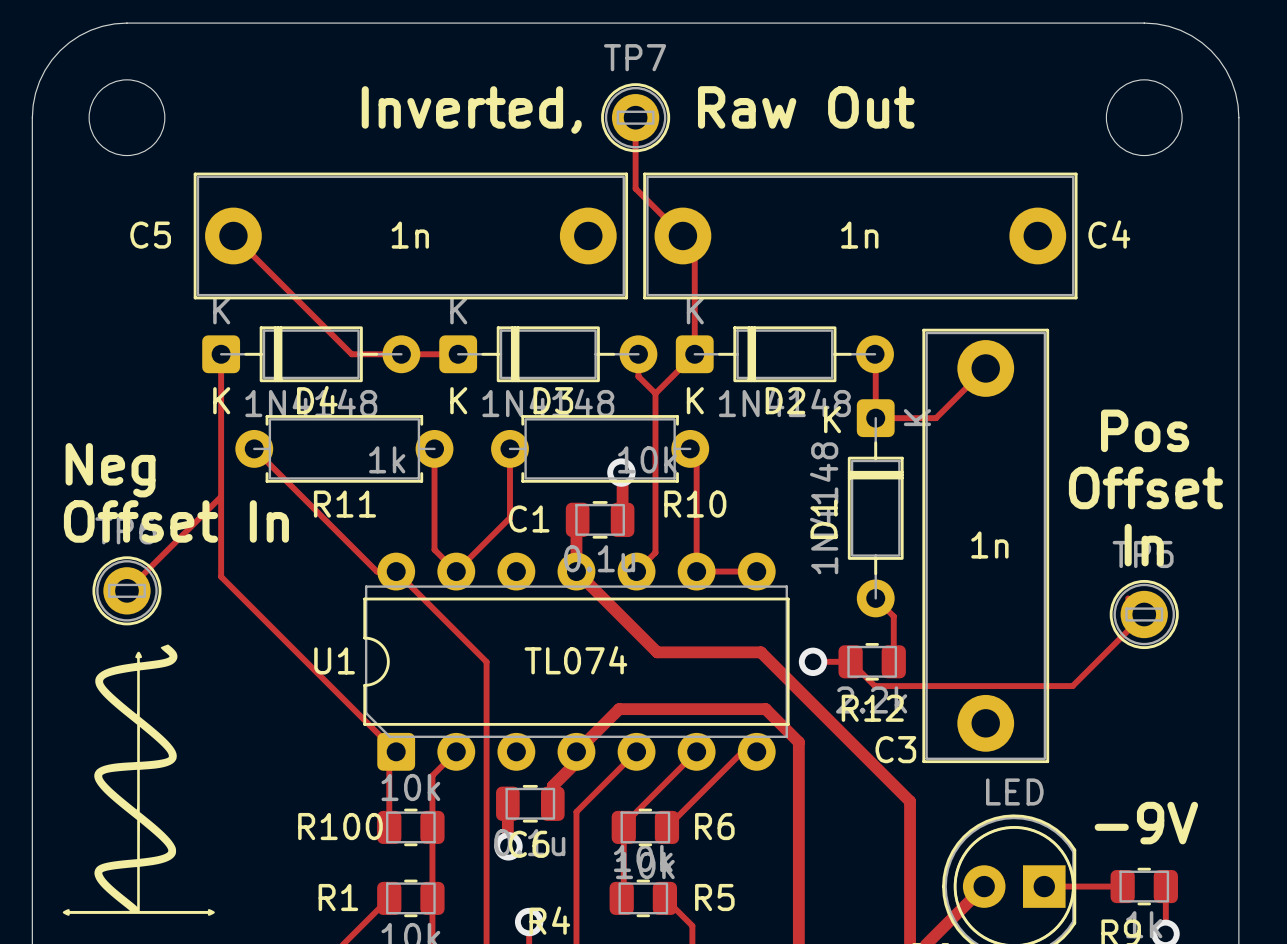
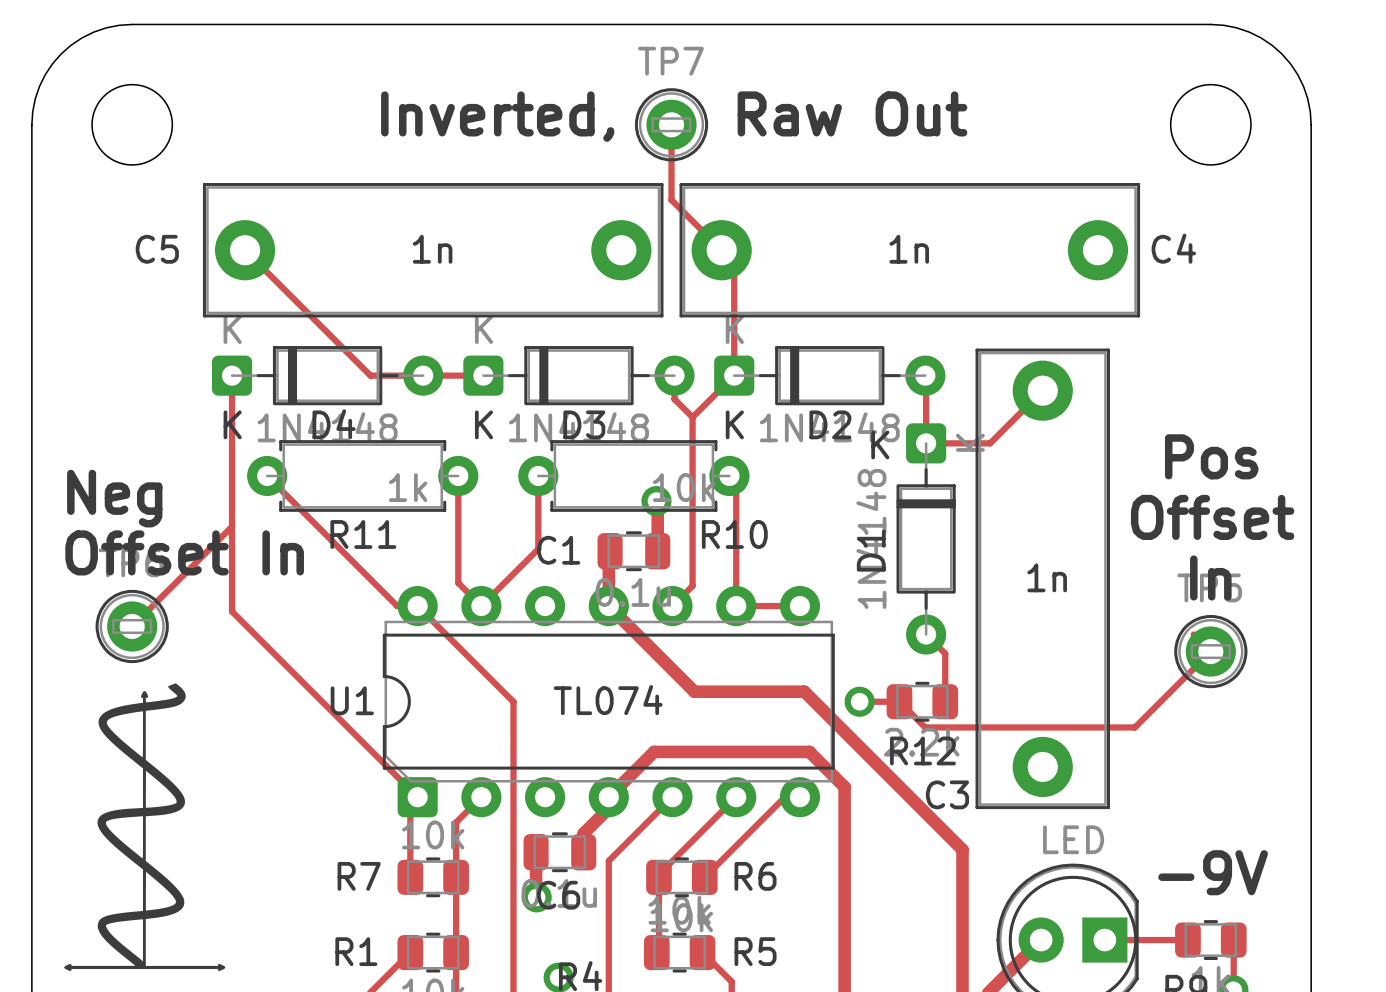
R100 name: R100 (340, 826) -> R7 (359, 876)

